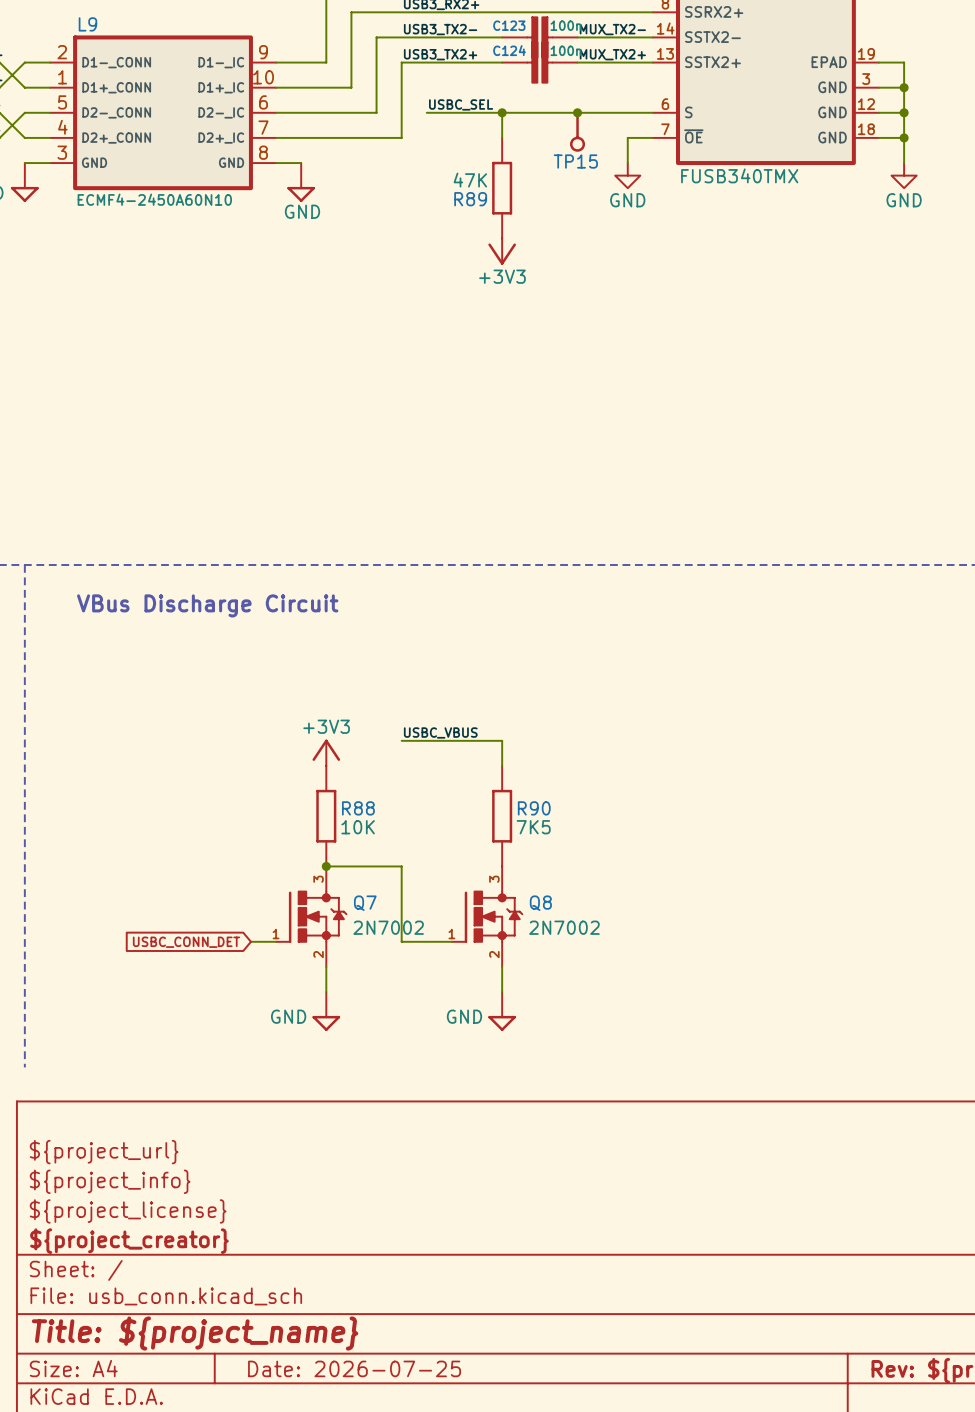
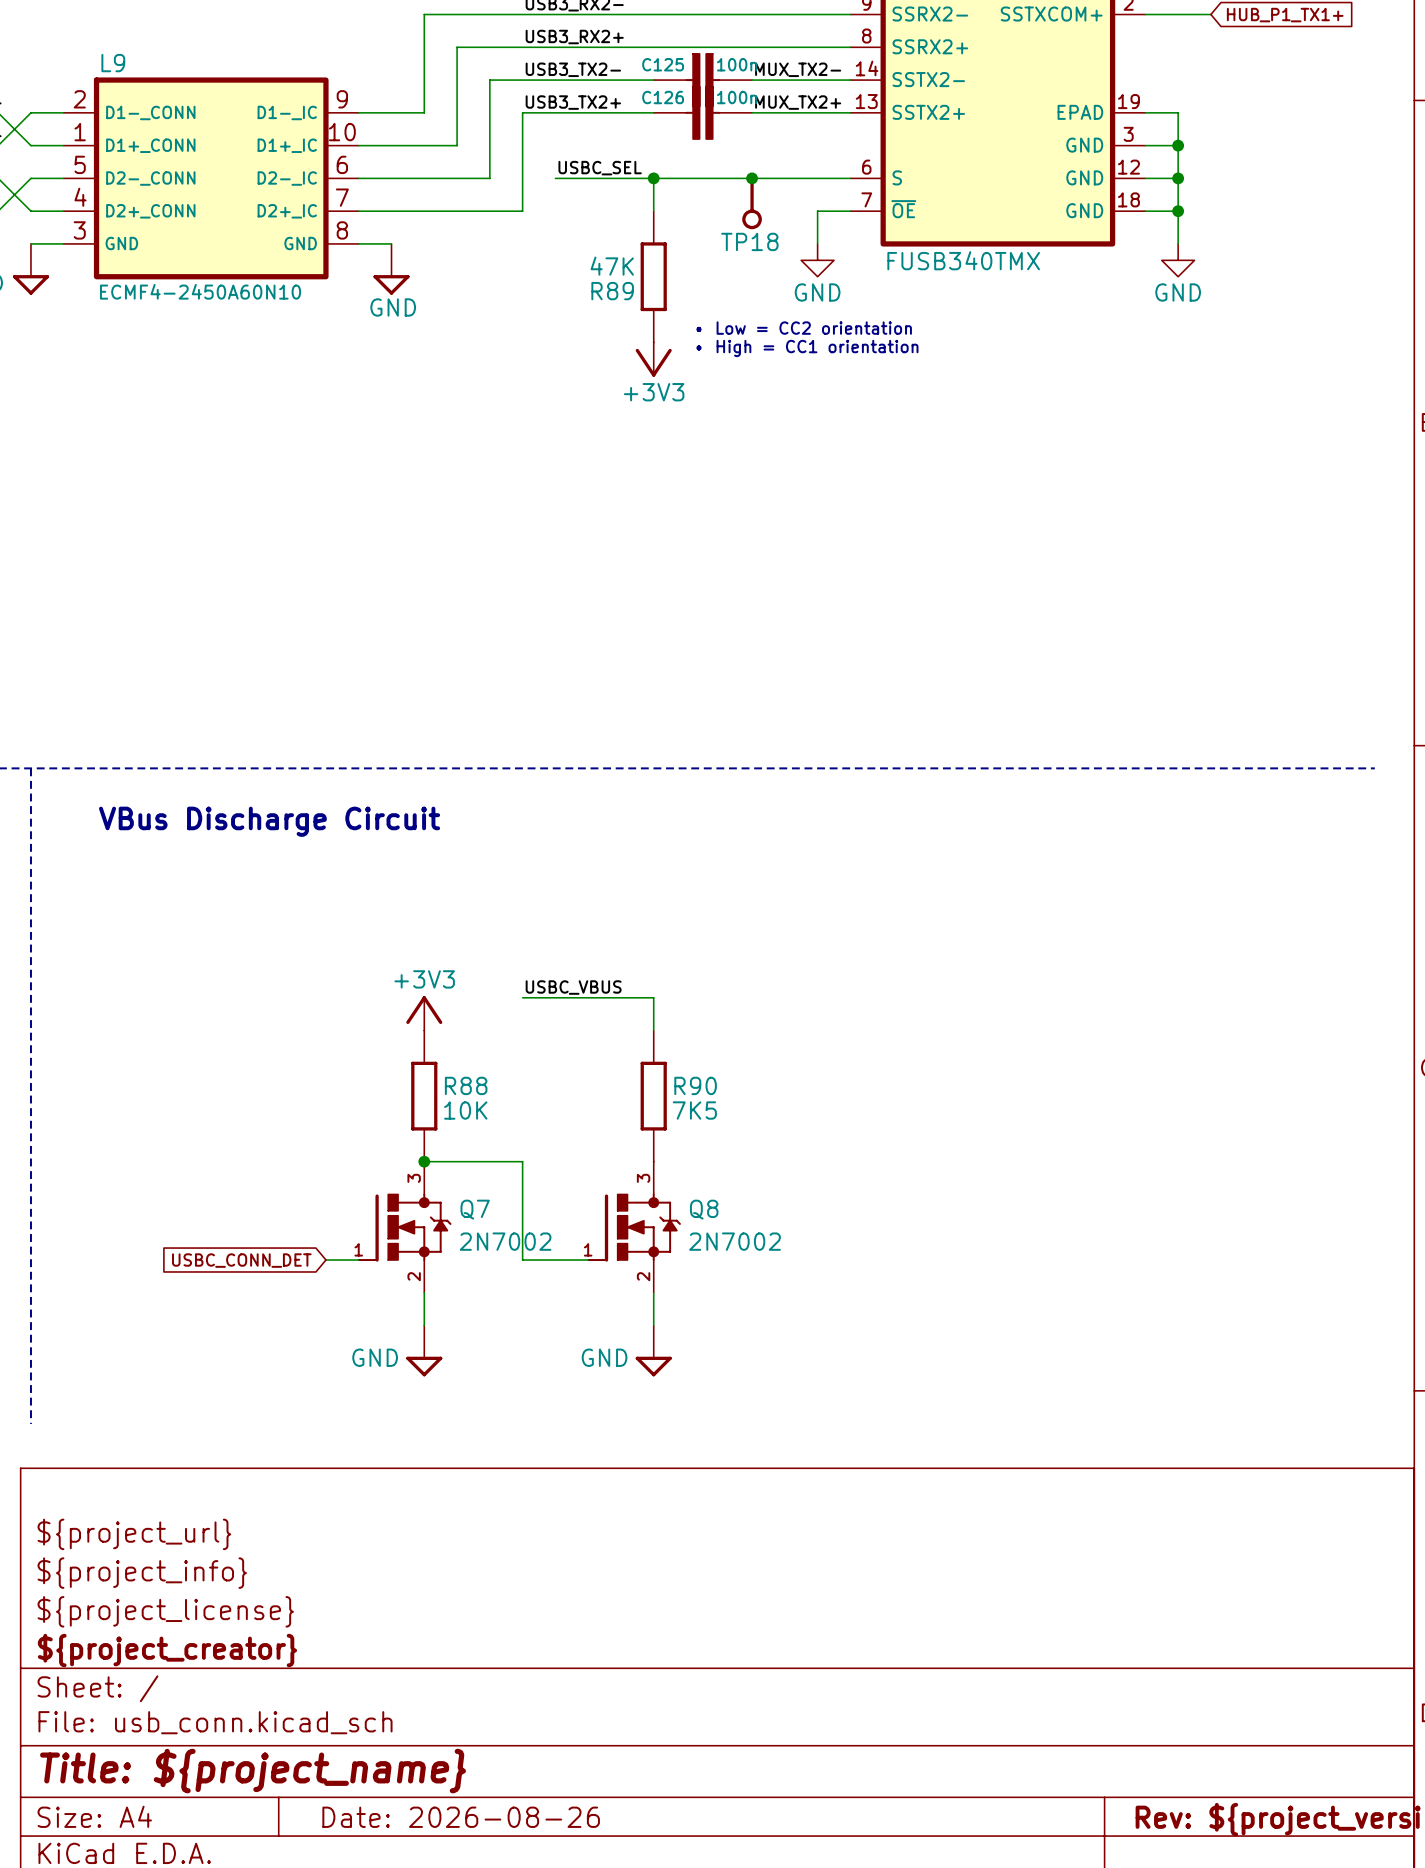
C123 name: C123 (509, 25) -> C125 (663, 64)
C124 name: C124 (509, 50) -> C126 (663, 97)
TP15 name: TP15 (575, 161) -> TP18 (749, 241)
text: none -> • Low = CC2 orientation (804, 328)
text: none -> • High = CC1 orientation (807, 348)
title block: Date: 2026-07-25 (354, 1368) -> Date: 2026-08-26 (461, 1817)

